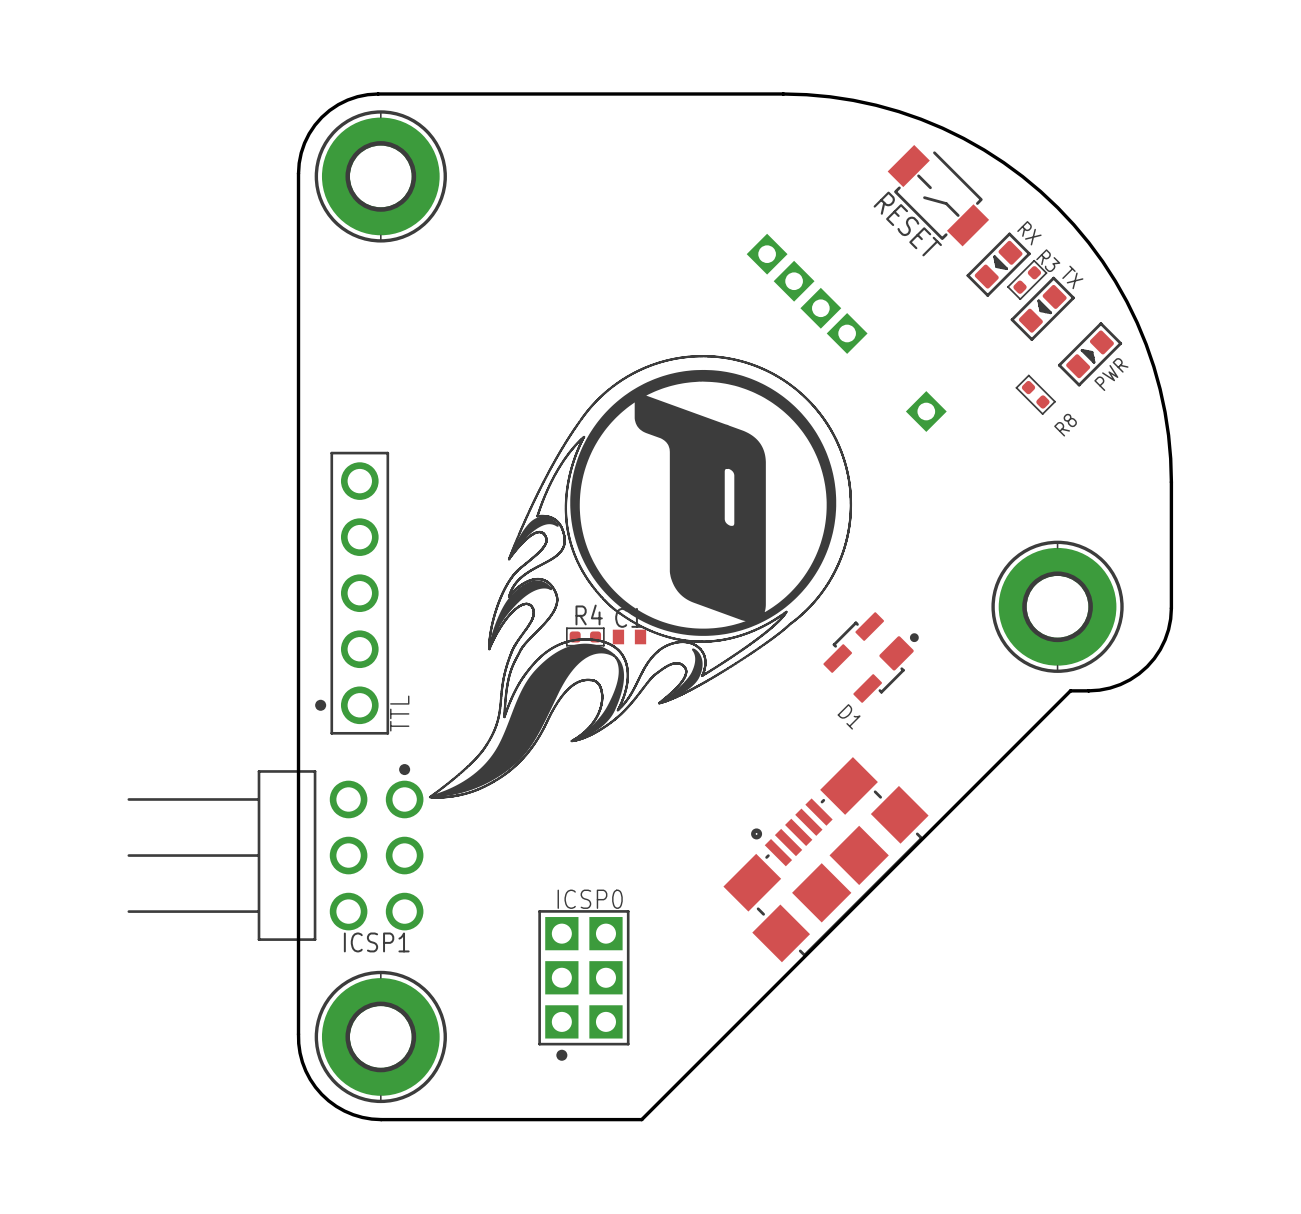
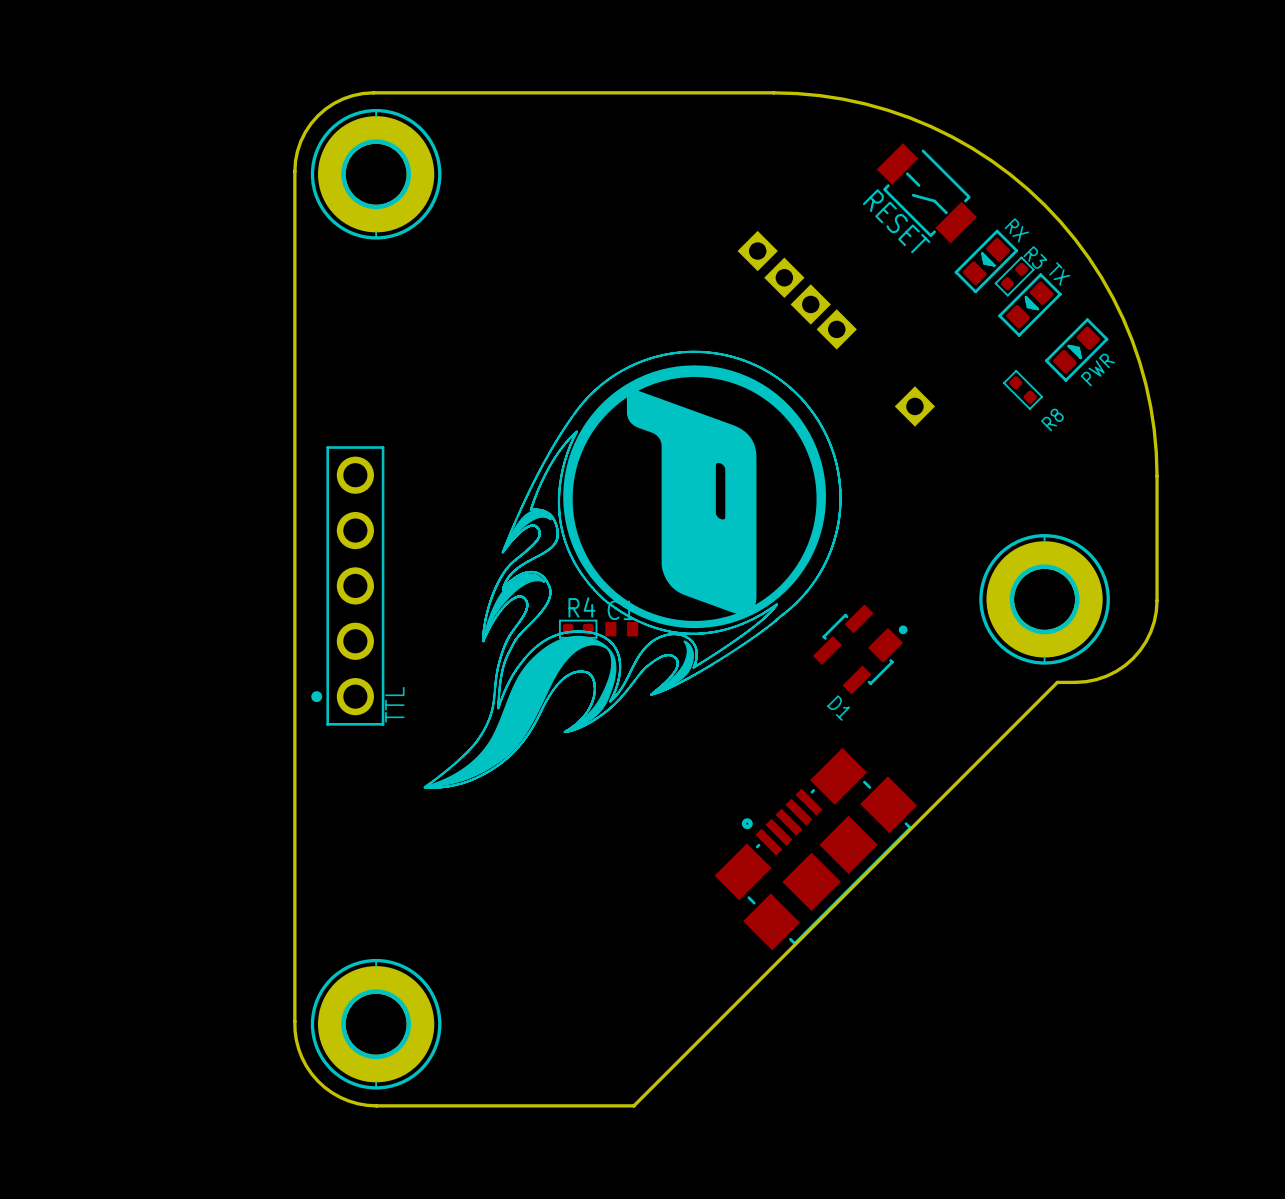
ICSP1: (275, 852) -> none
ICSP0: (583, 985) -> none

